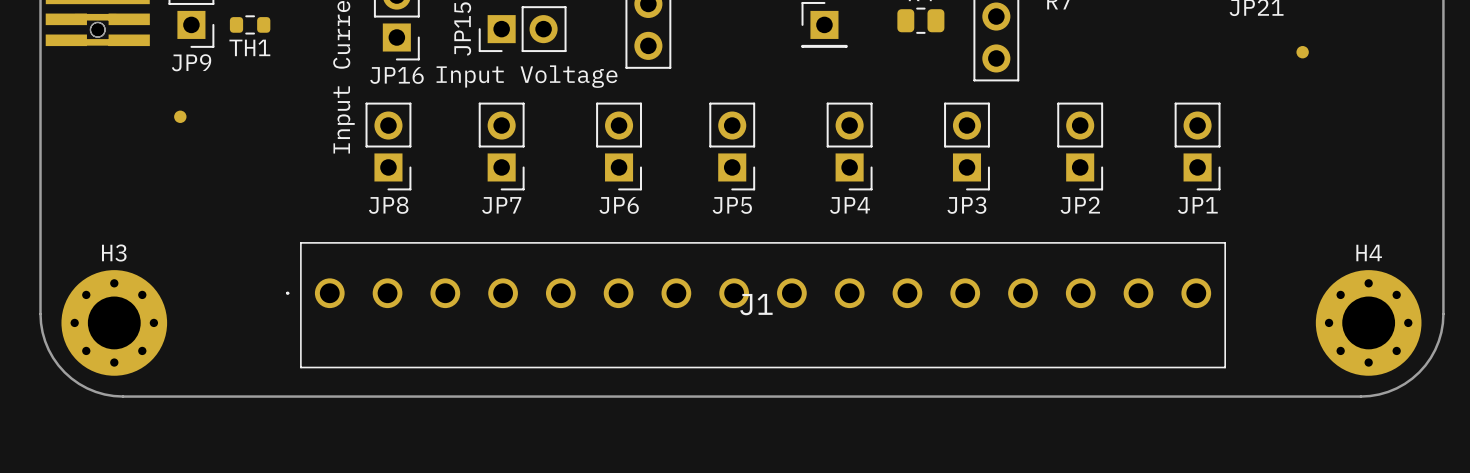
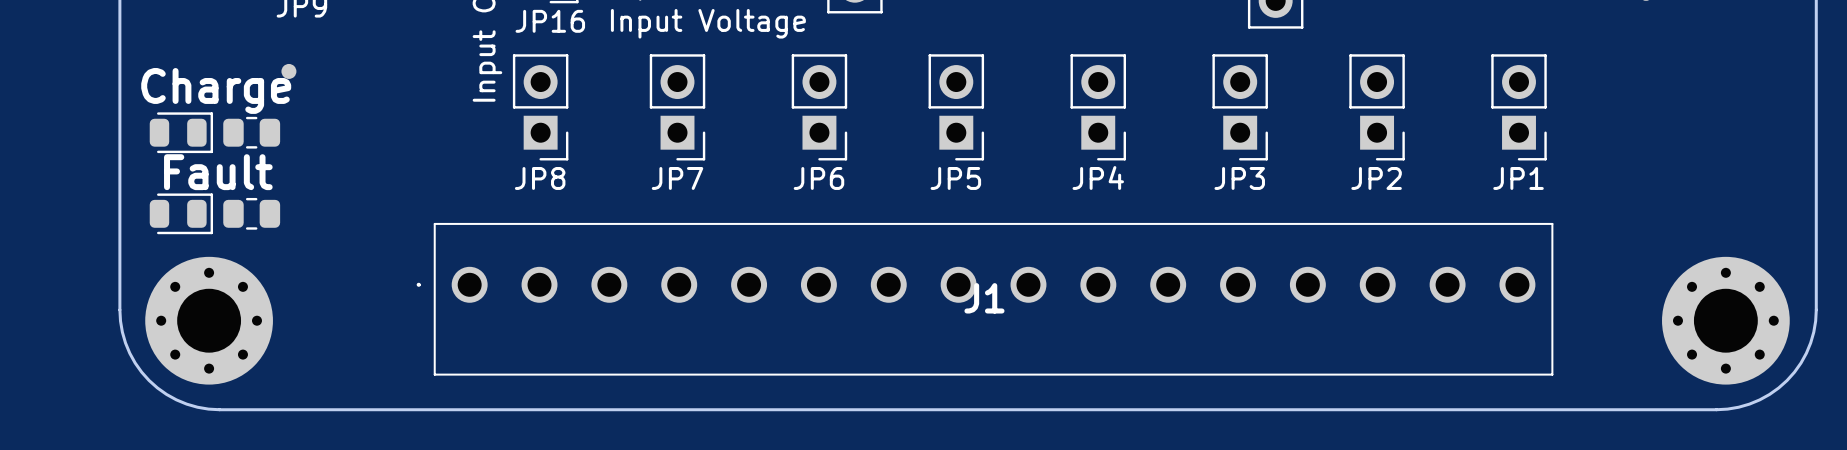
text: none -> Charge (216, 90)
part: none -> (181, 132)
part: none -> (251, 132)
text: none -> Fault (218, 172)
part: none -> (181, 213)
part: none -> (251, 213)
H3 name: H3 (114, 253) -> none
H4 name: H4 (1369, 253) -> none

